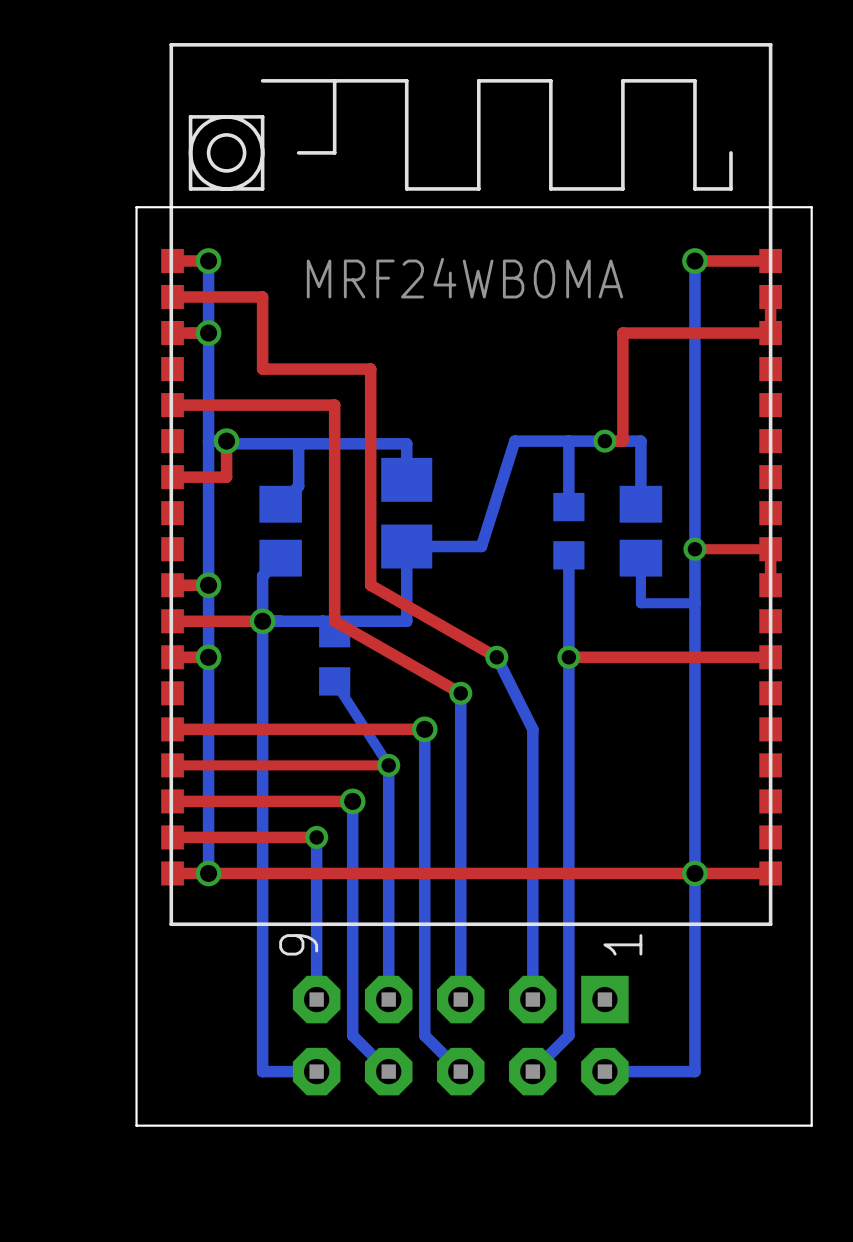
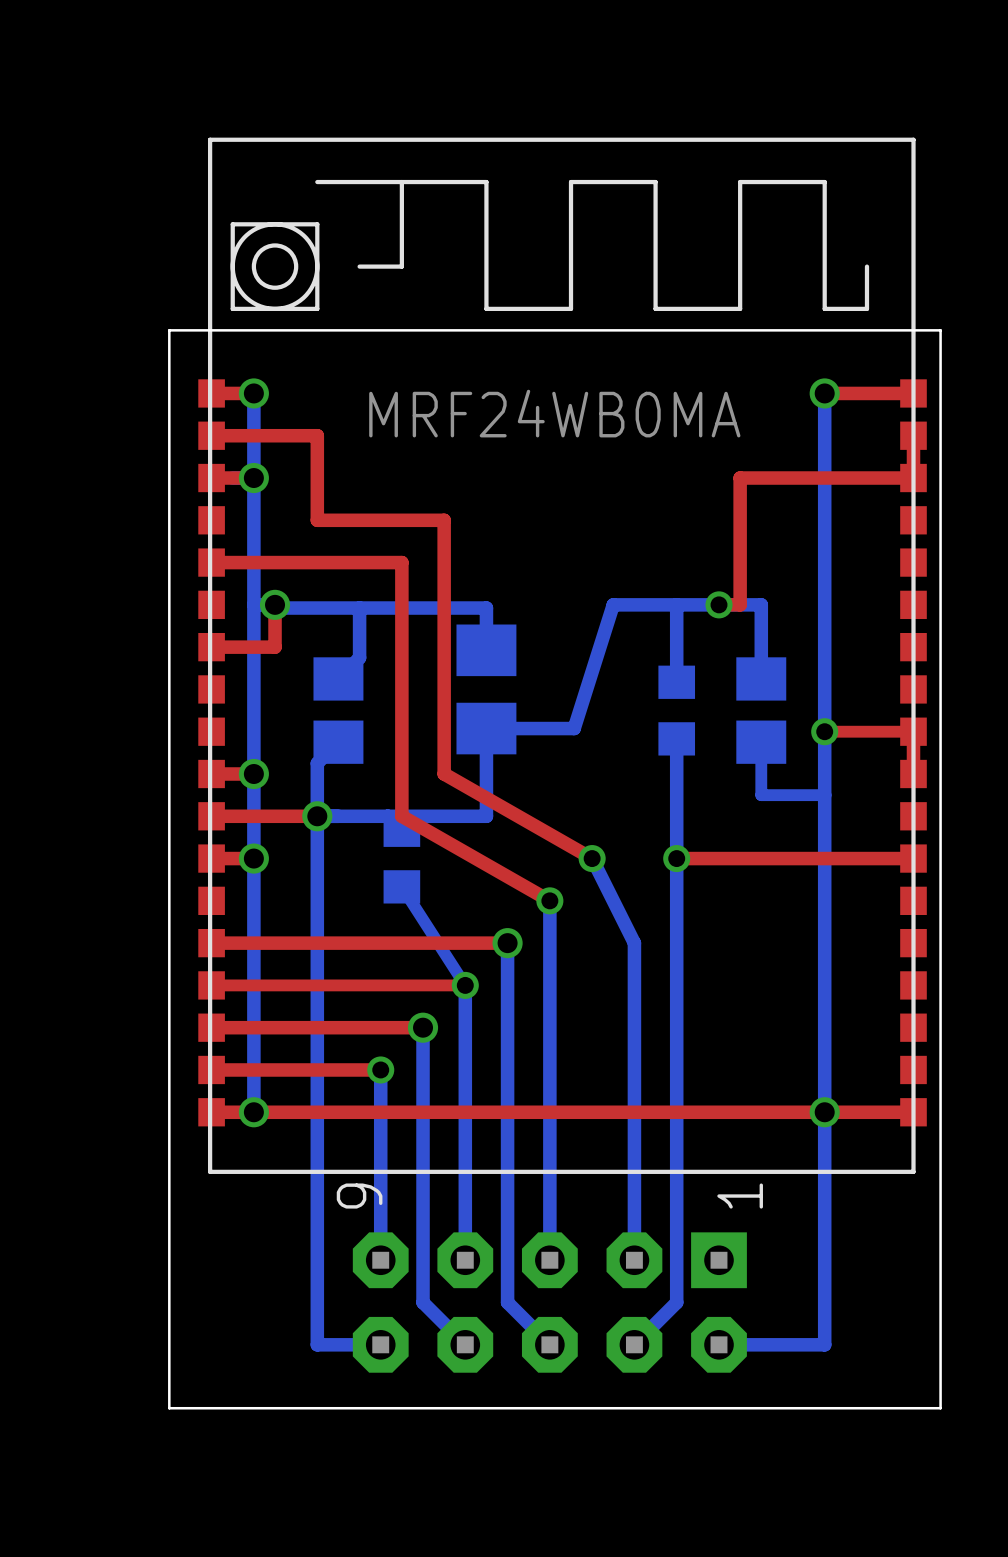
board edge: (793, 207) (811, 207) (811, 1125) (793, 1125) -> (940, 330) (940, 1408)

